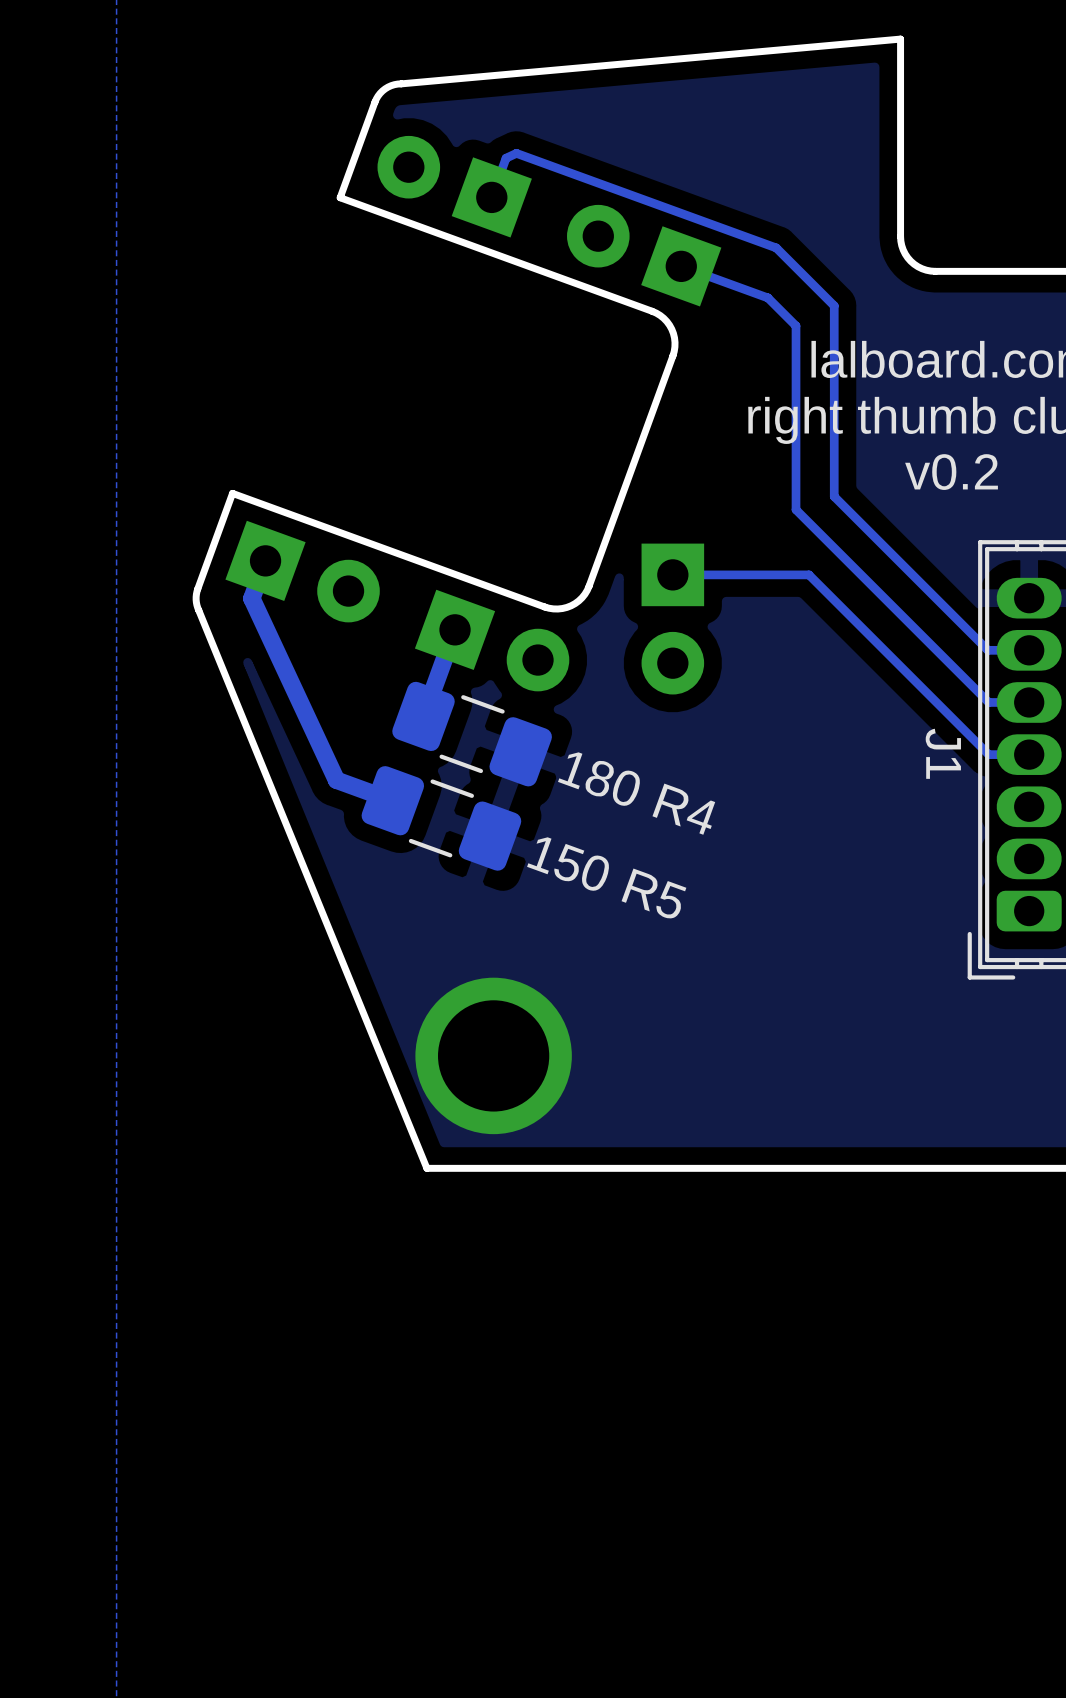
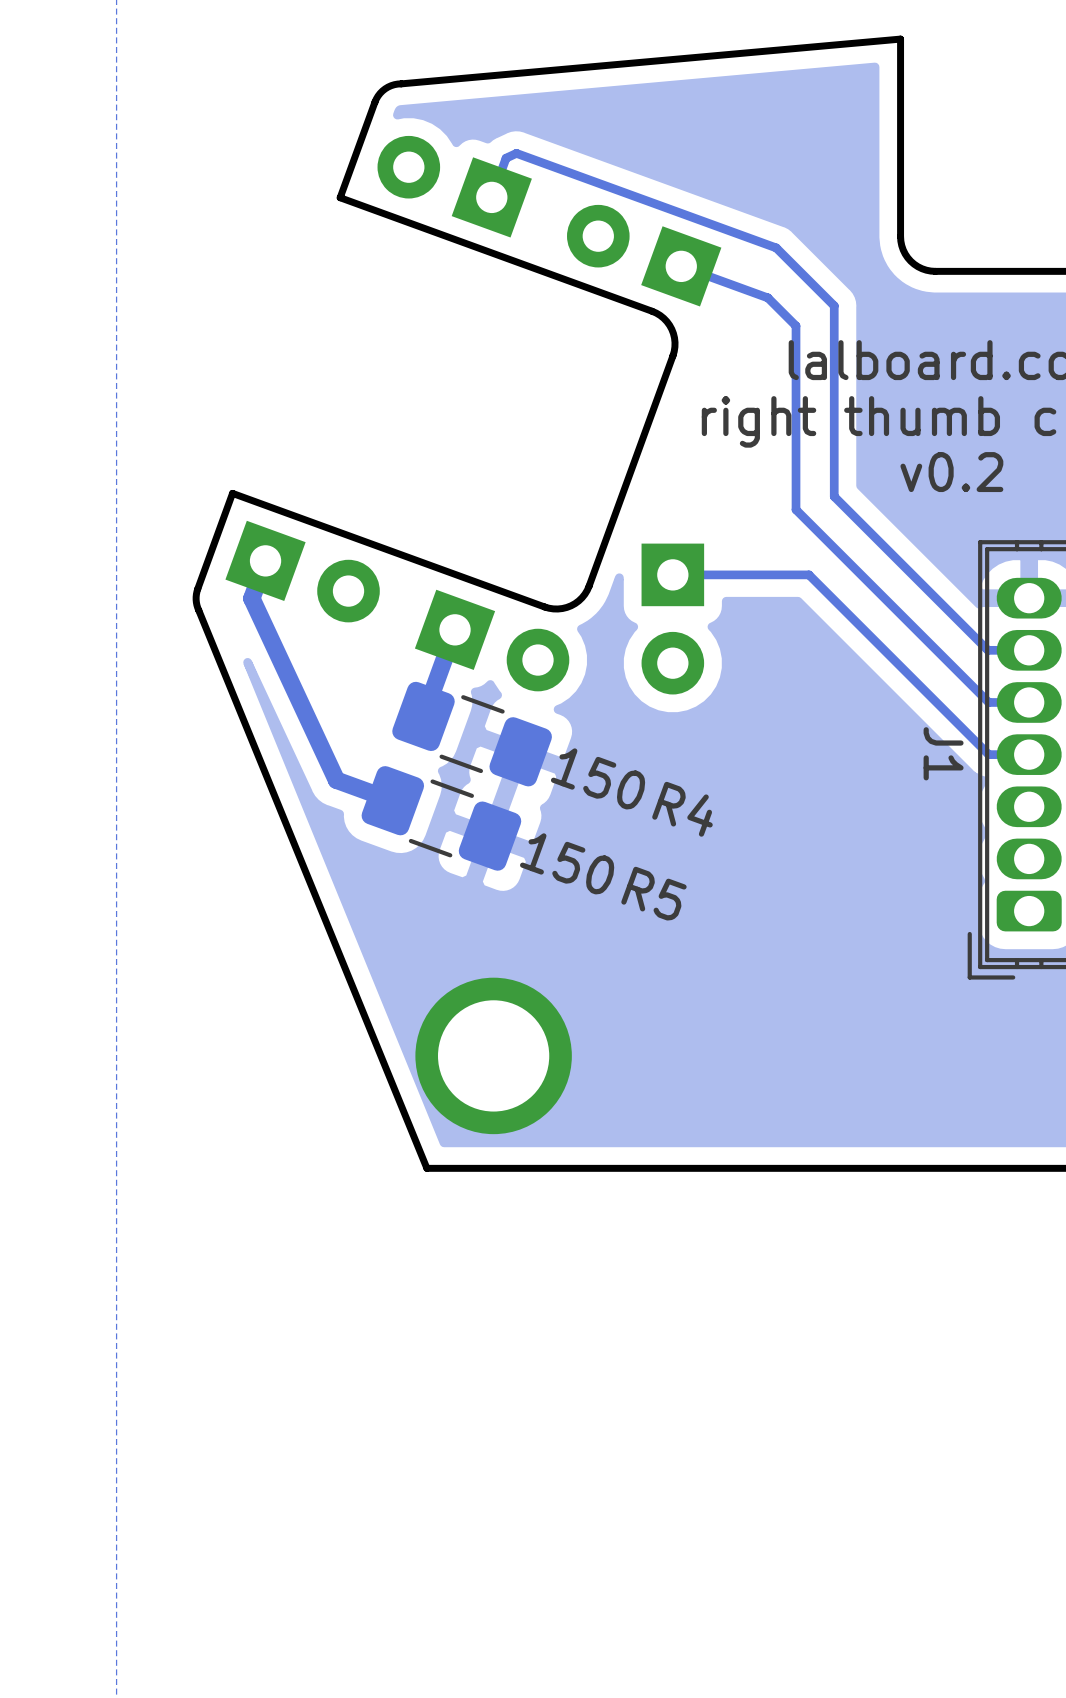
R4 value: 180 (599, 779) -> none
text: none -> 150 (598, 778)

